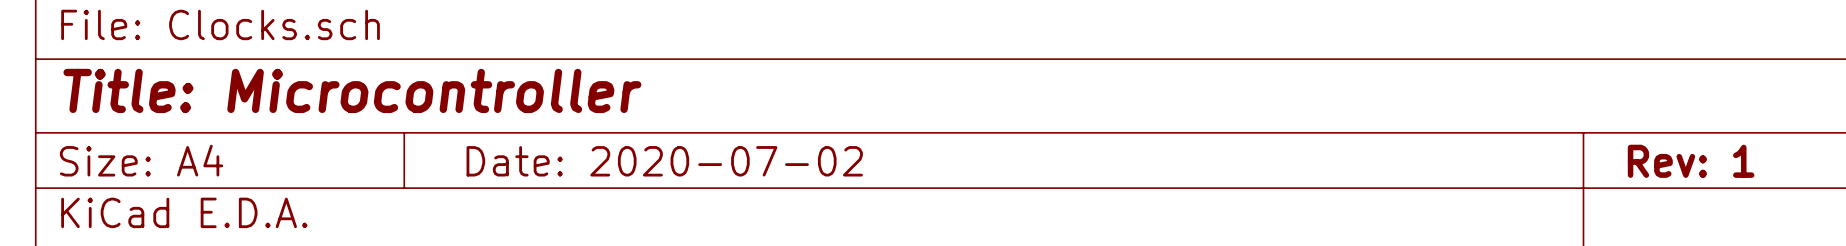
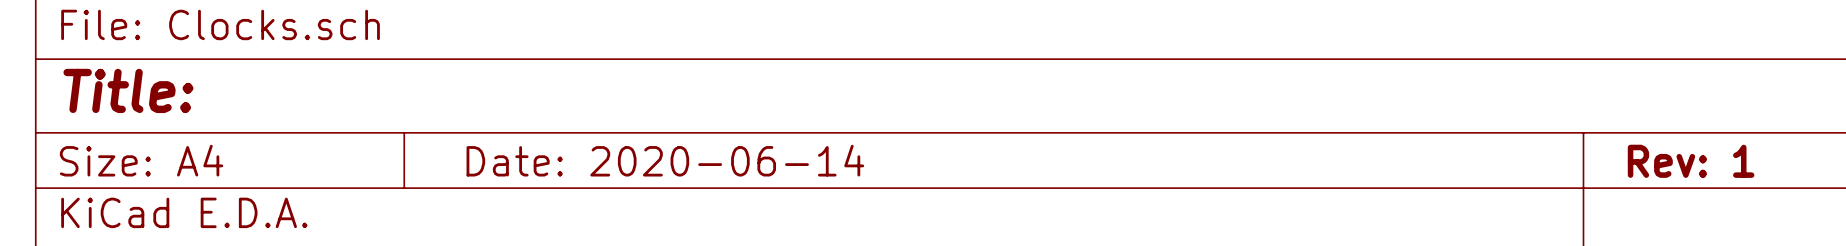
title block: Title: Microcontroller (352, 90) -> Title: (128, 90)
title block: Date: 2020-07-02 (664, 161) -> Date: 2020-06-14 (665, 160)

